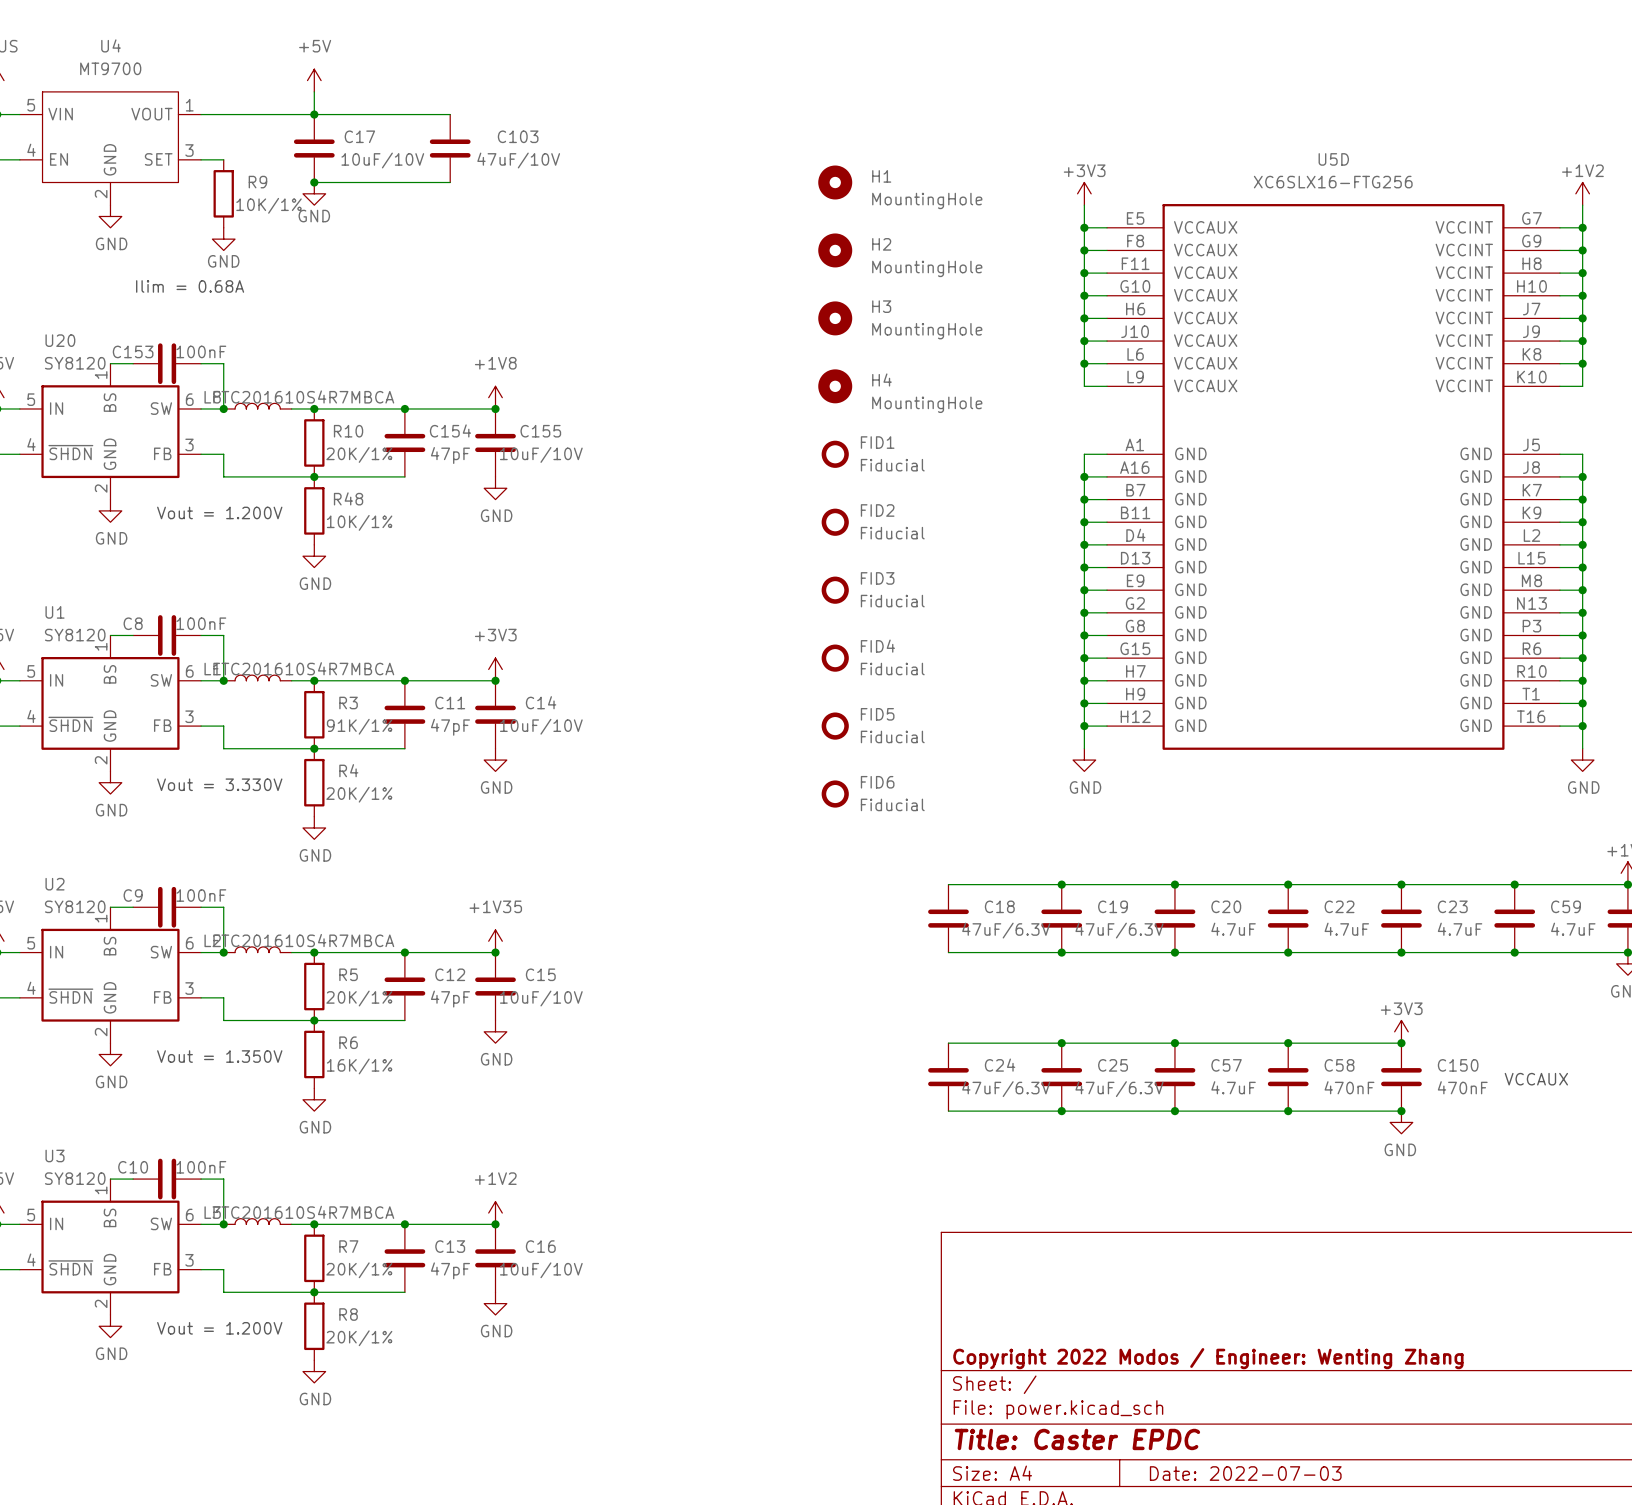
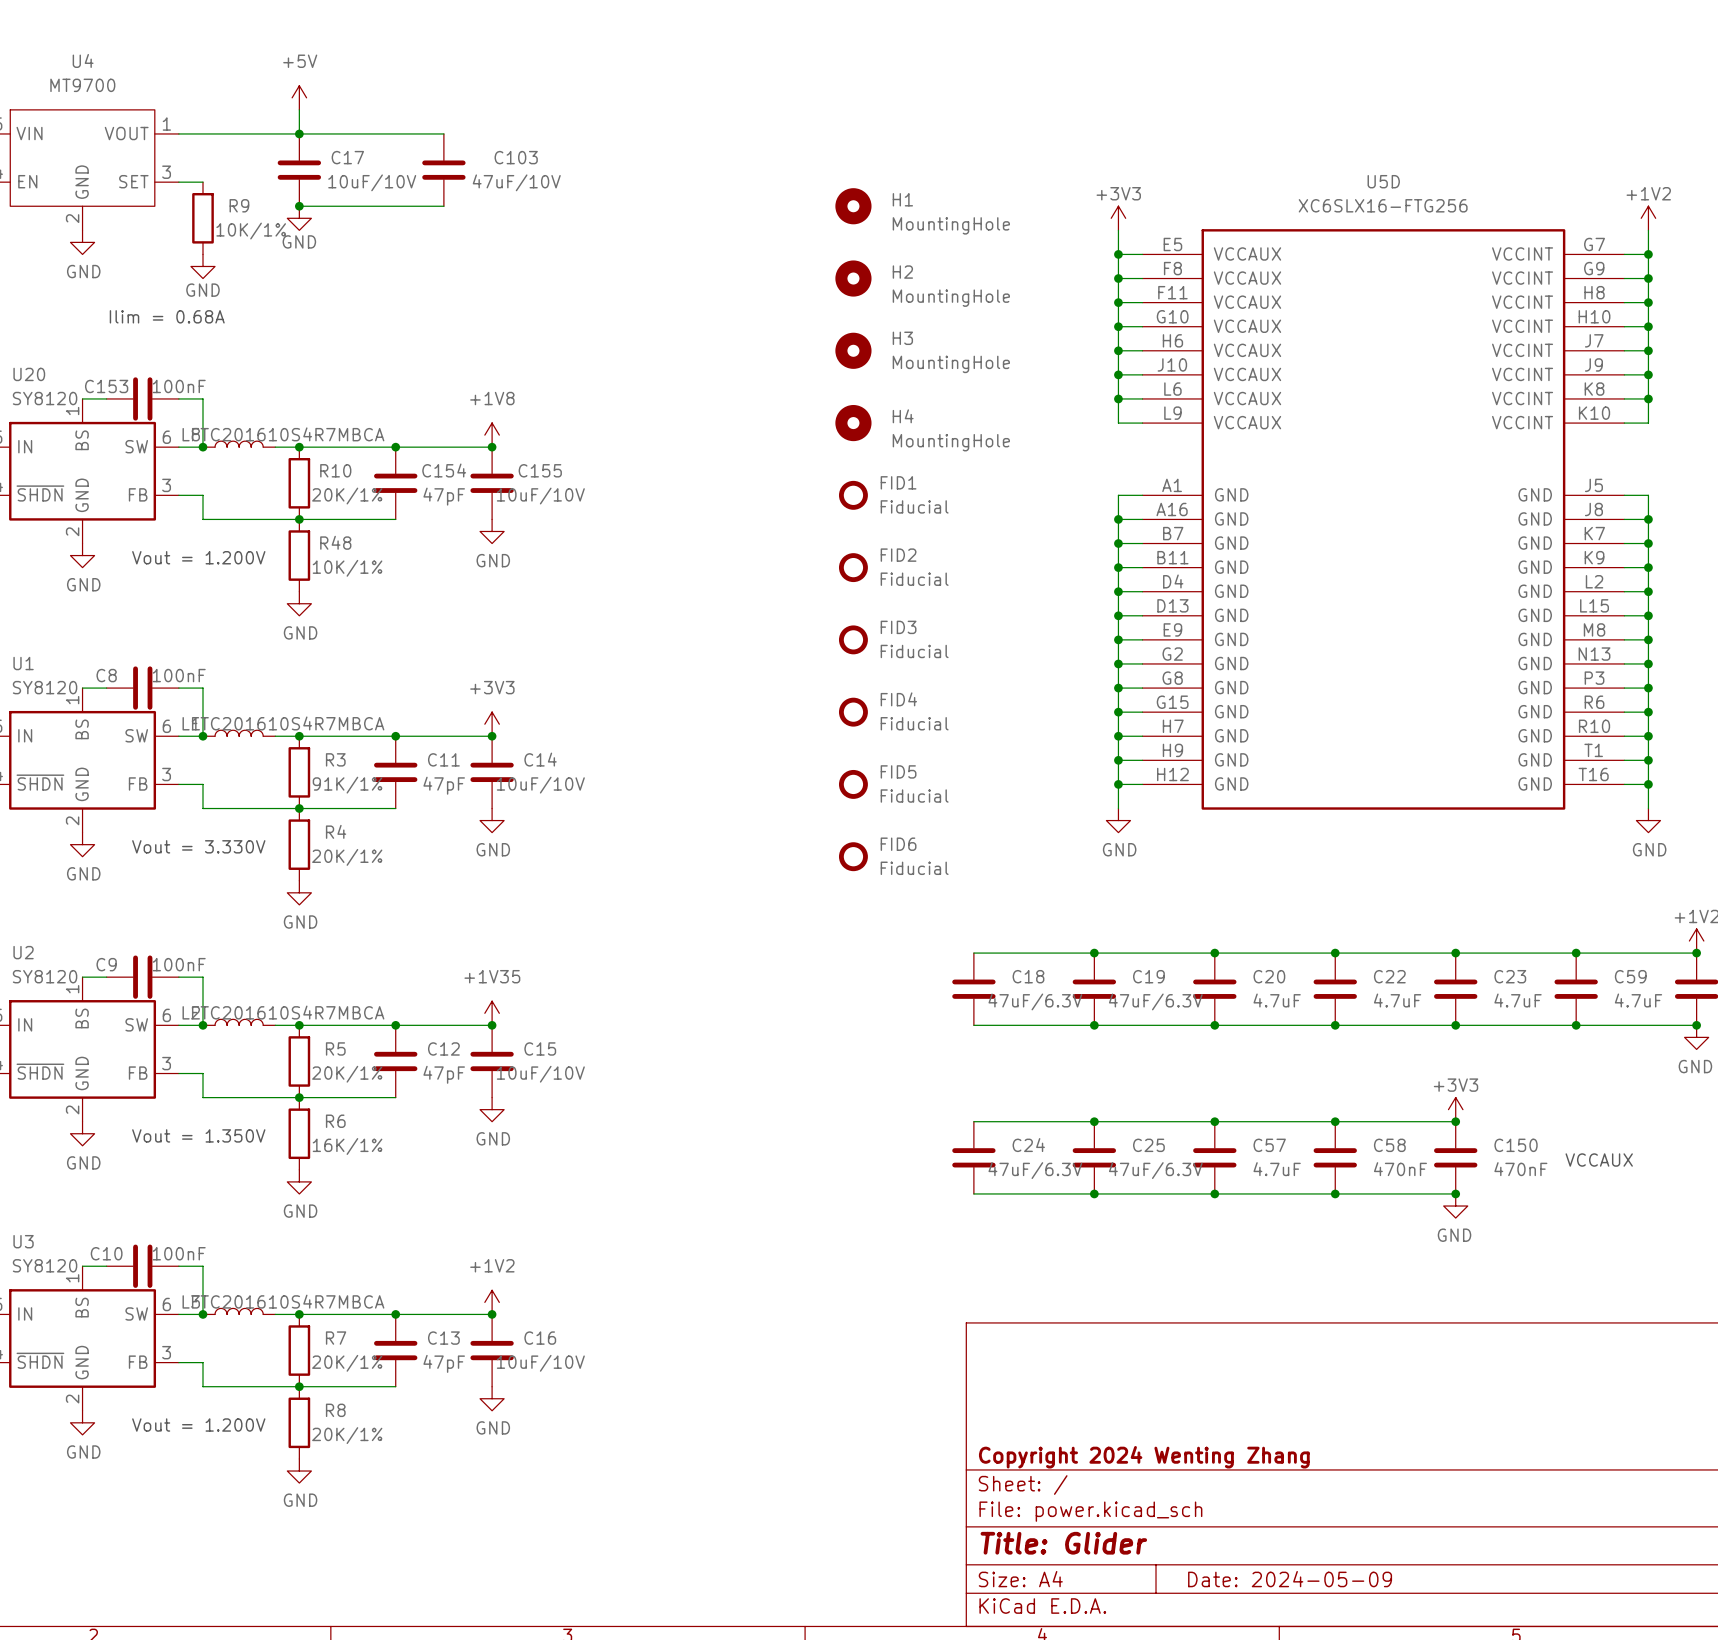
title block: Copyright 2022 Modos / Engineer: Wenting Zhang (1208, 1358) -> Copyright 2024 Wenting Zhang (1144, 1457)
title block: Title: Caster EPDC (1077, 1439) -> Title: Glider (1063, 1543)
title block: Date: 2022-07-03 (1245, 1473) -> Date: 2024-05-09 (1290, 1579)

